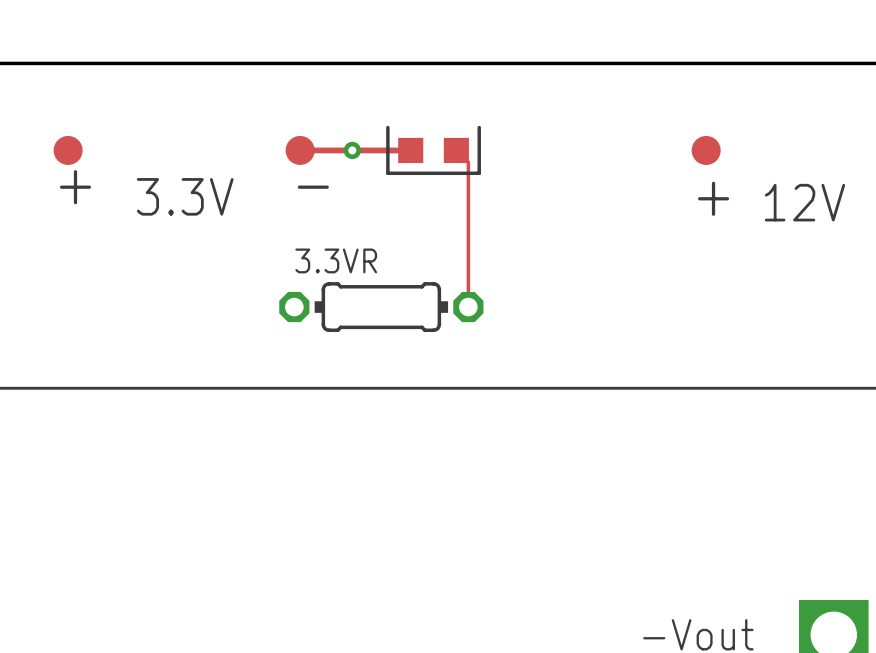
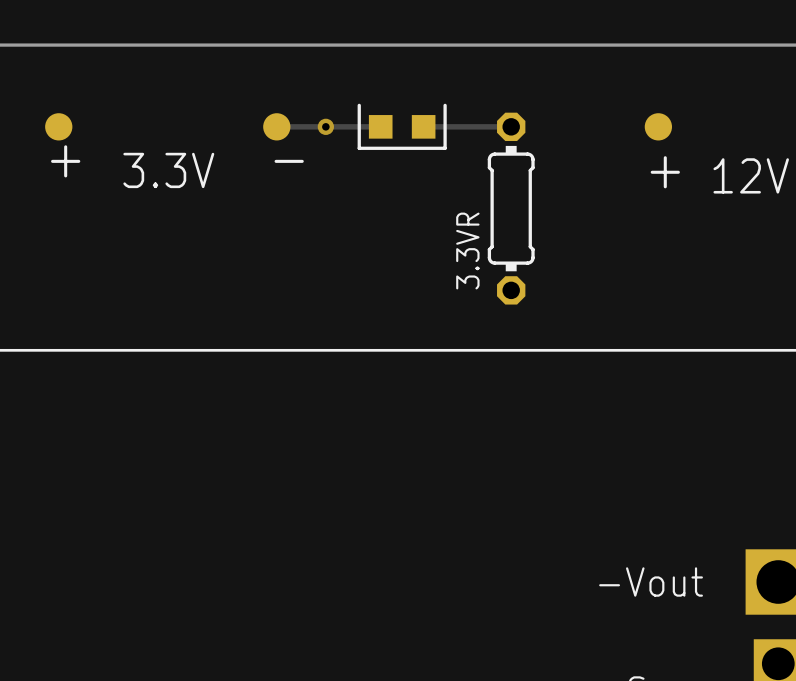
track: (456, 150) (468, 162) (468, 307) -> (423, 126) (511, 126)
3.3VR name position: 3.3VR (336, 260) -> 3.3VR (467, 251)
3.3VR rotation: 0° (381, 307) -> 90° clockwise (511, 208)
3.3VR position: (381, 307) -> (511, 208)

